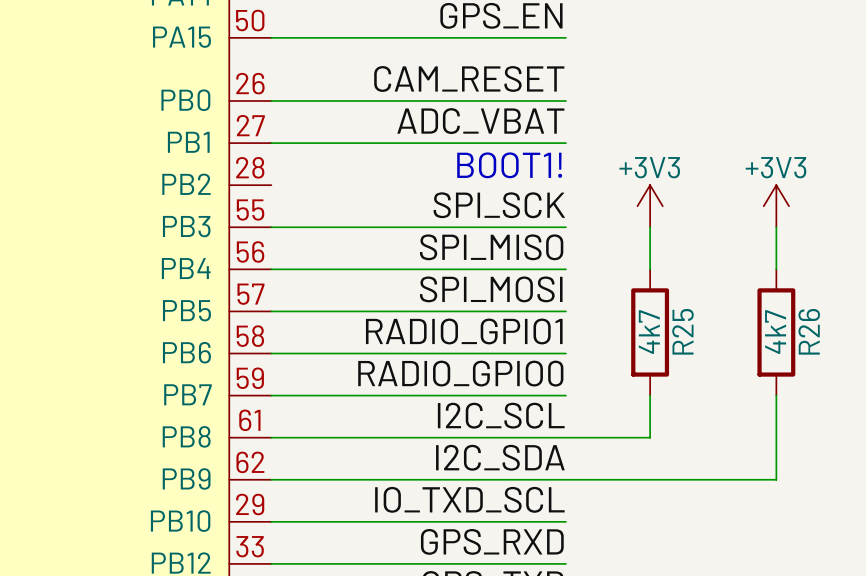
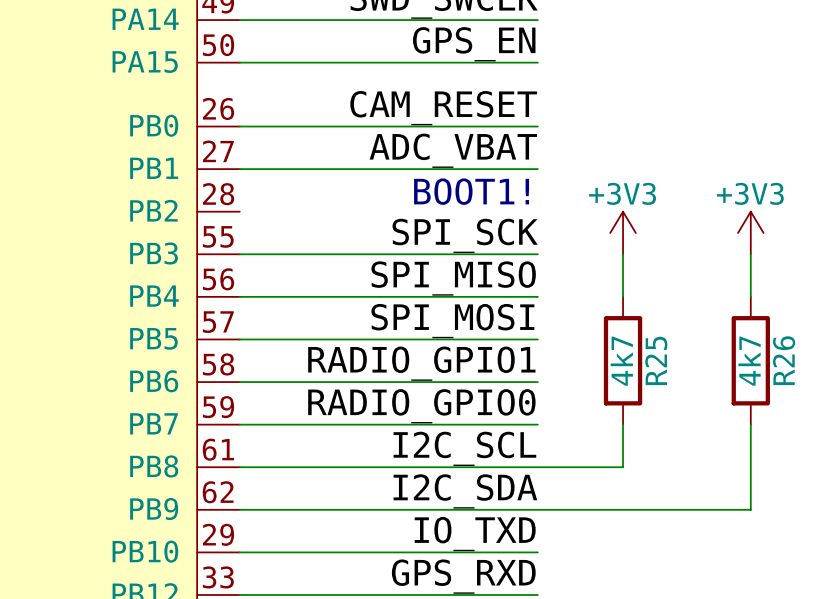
label: IO_TXD_SCL (469, 499) -> IO_TXD (475, 534)

